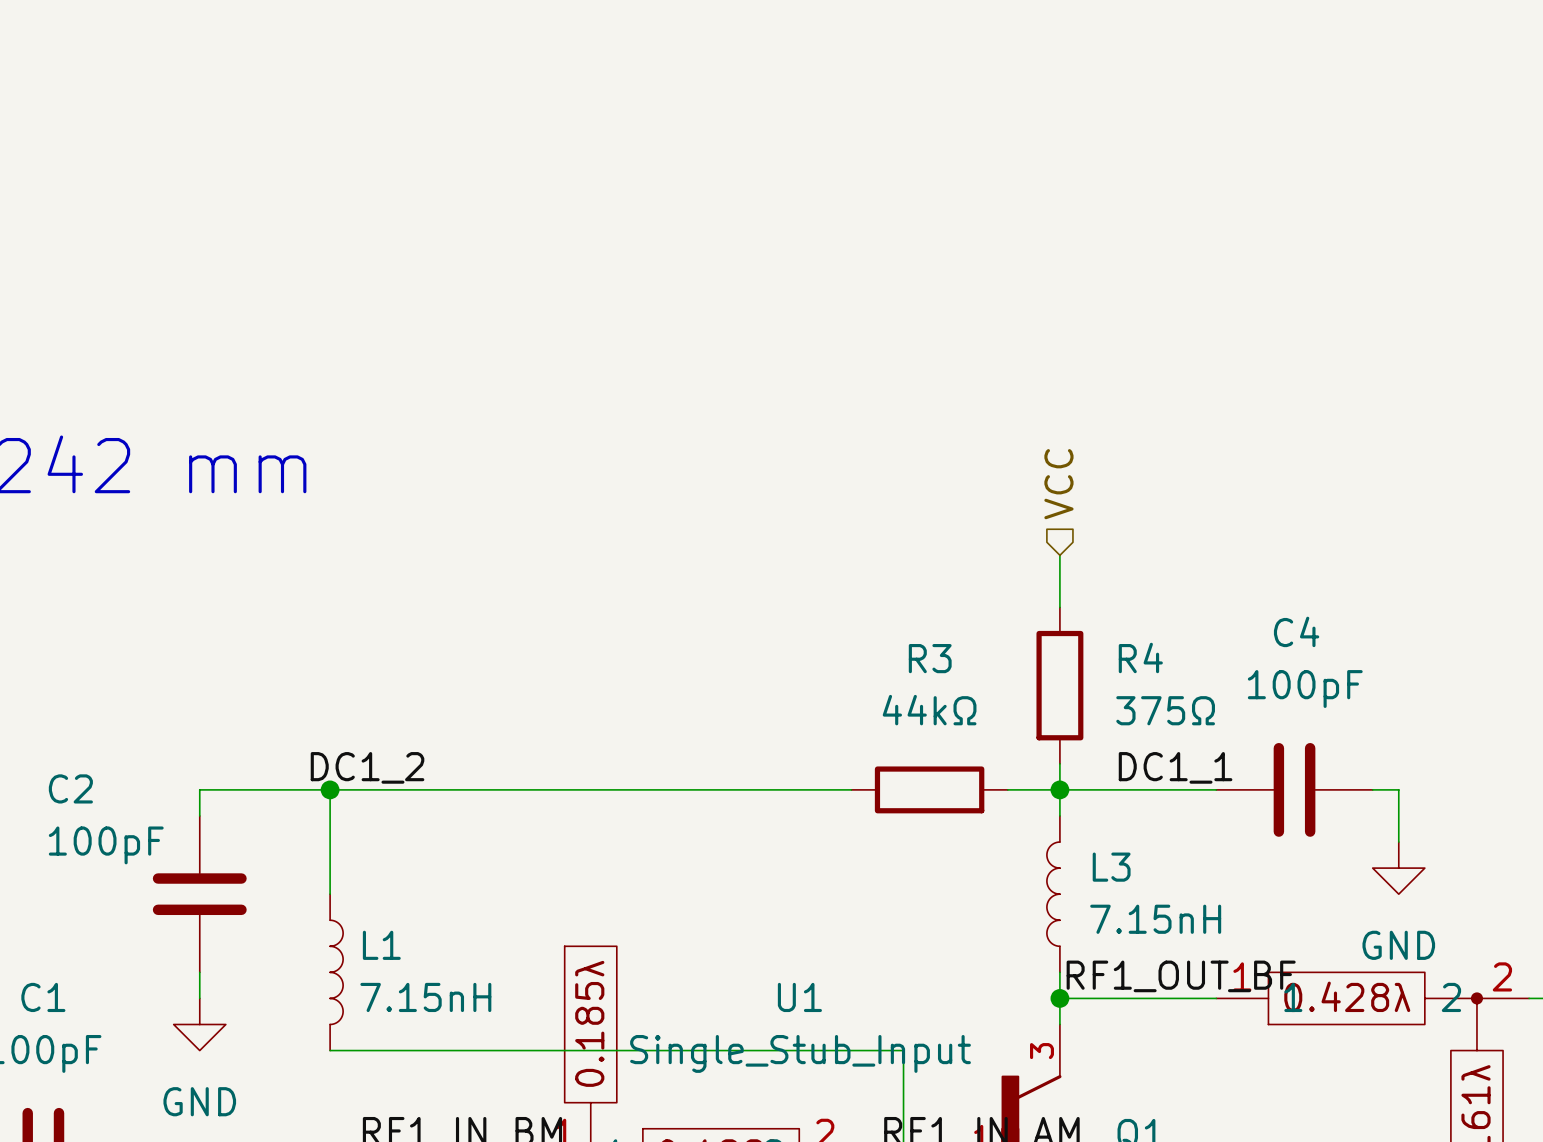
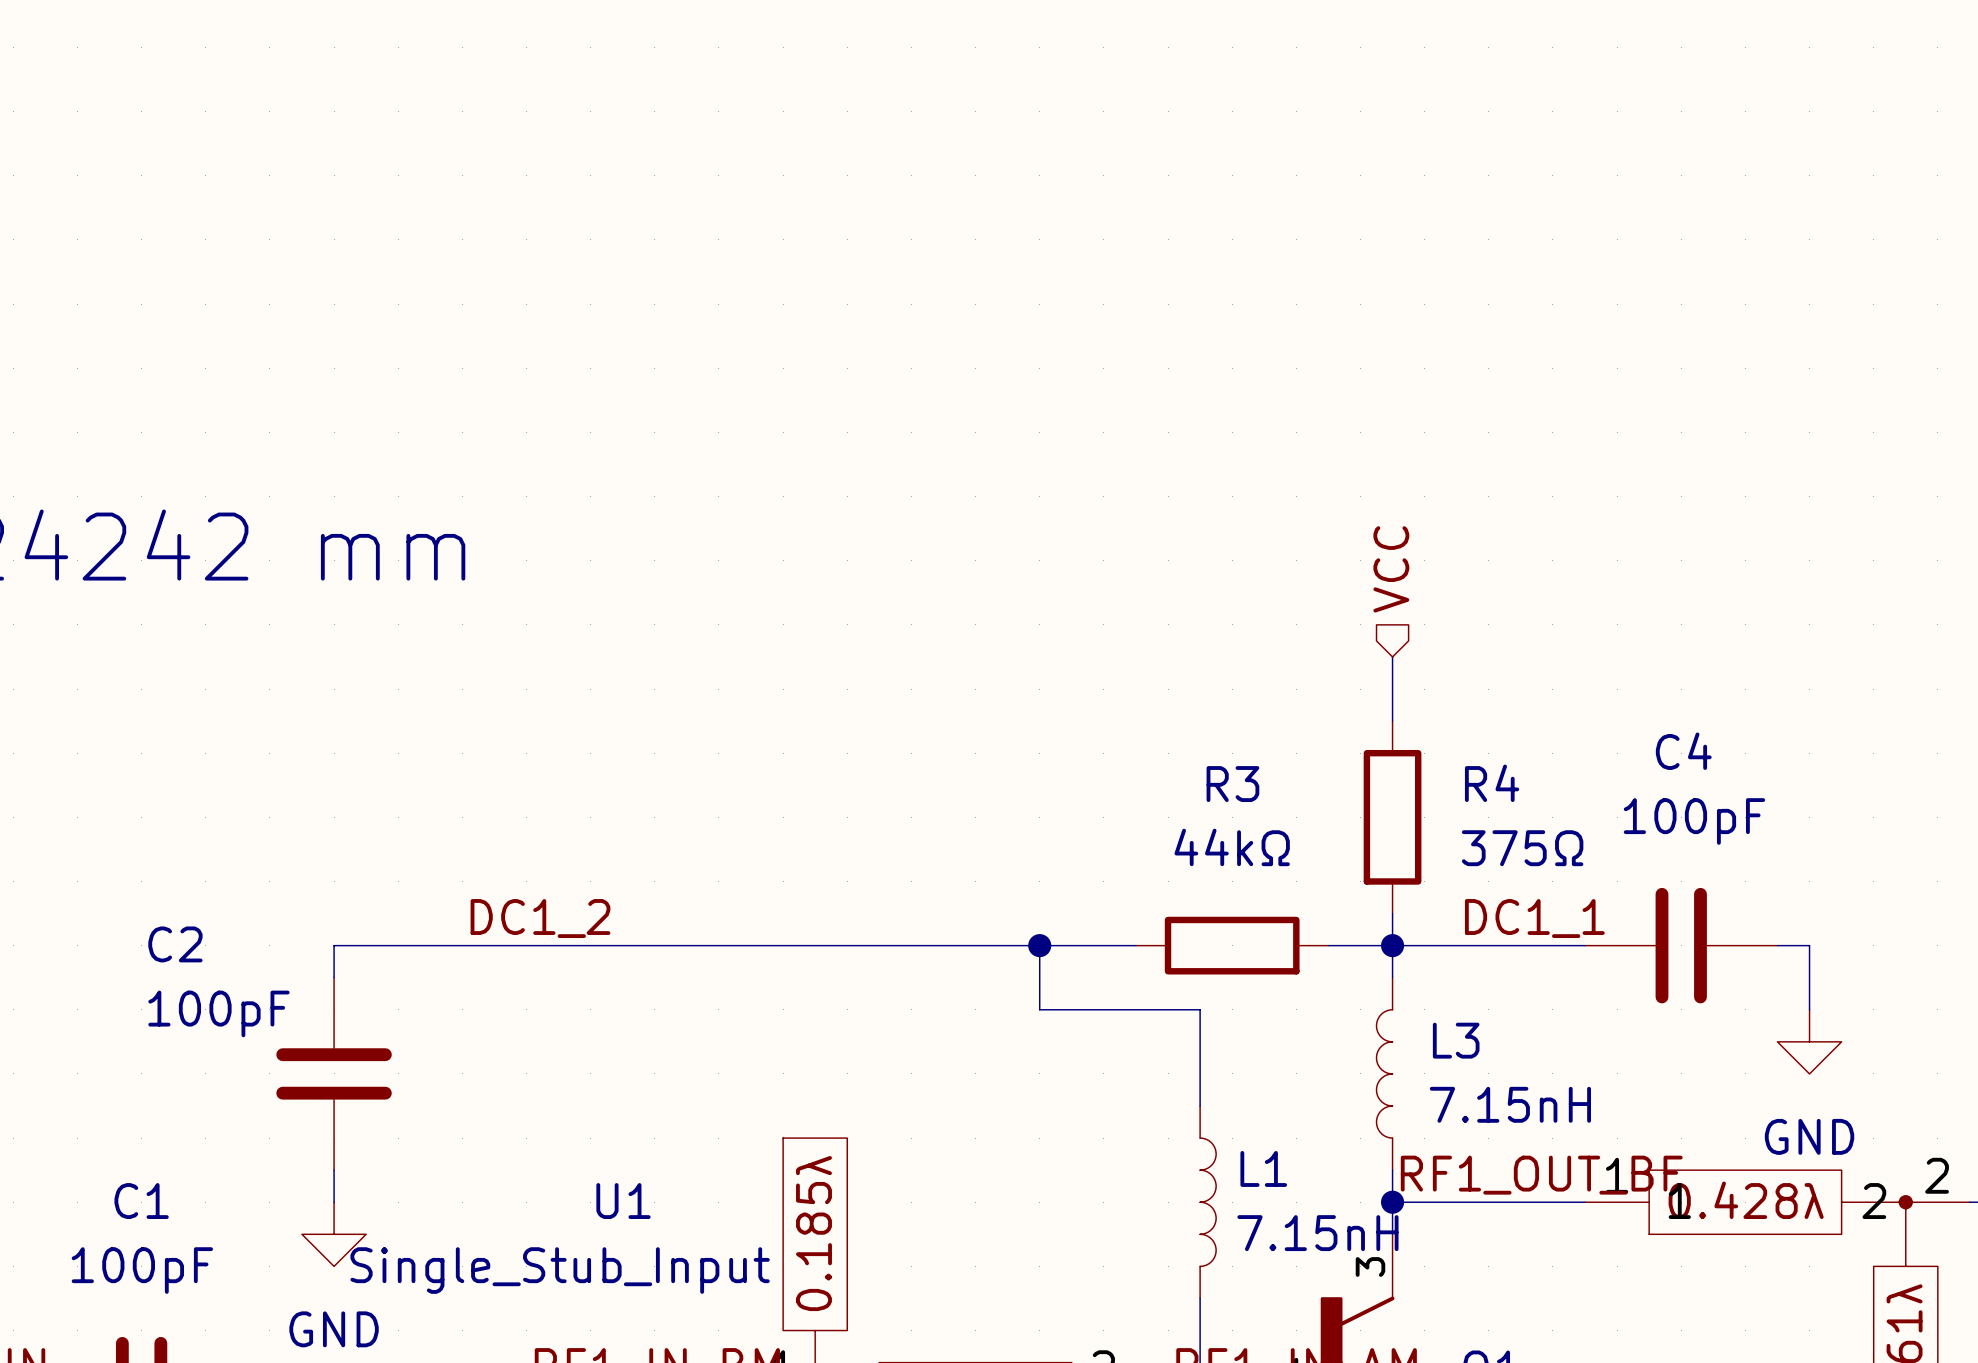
wire: (330, 789) (330, 894) -> none
junction: (330, 789) -> none
wire: none -> (1039, 945) (1039, 1009) (1200, 1009) (1200, 1106)
junction: none -> (1039, 945)
L1 position: (336, 972) -> (1208, 1202)
U1 name position: U1 (799, 997) -> U1 (623, 1201)
wire: (330, 1050) (903, 1050) (903, 1076) -> none
U1 value position: Single_Stub_Input (800, 1053) -> Single_Stub_Input (560, 1270)

